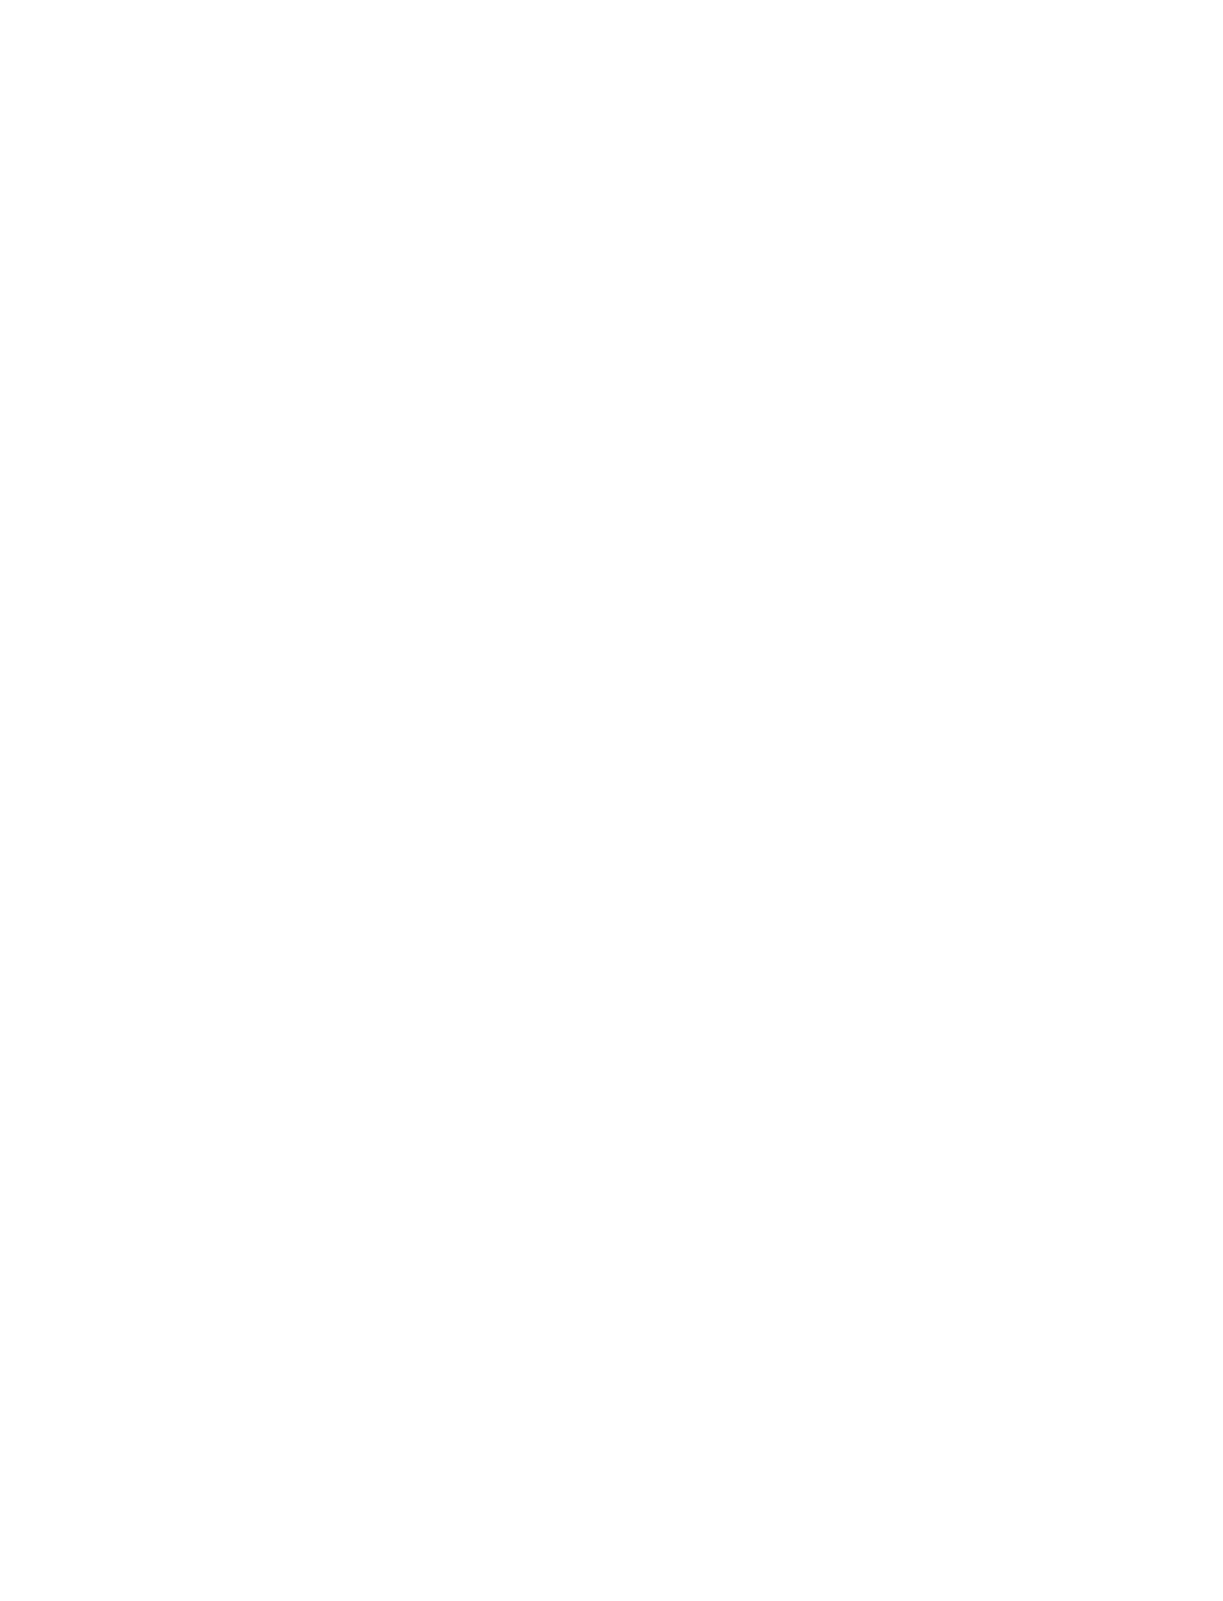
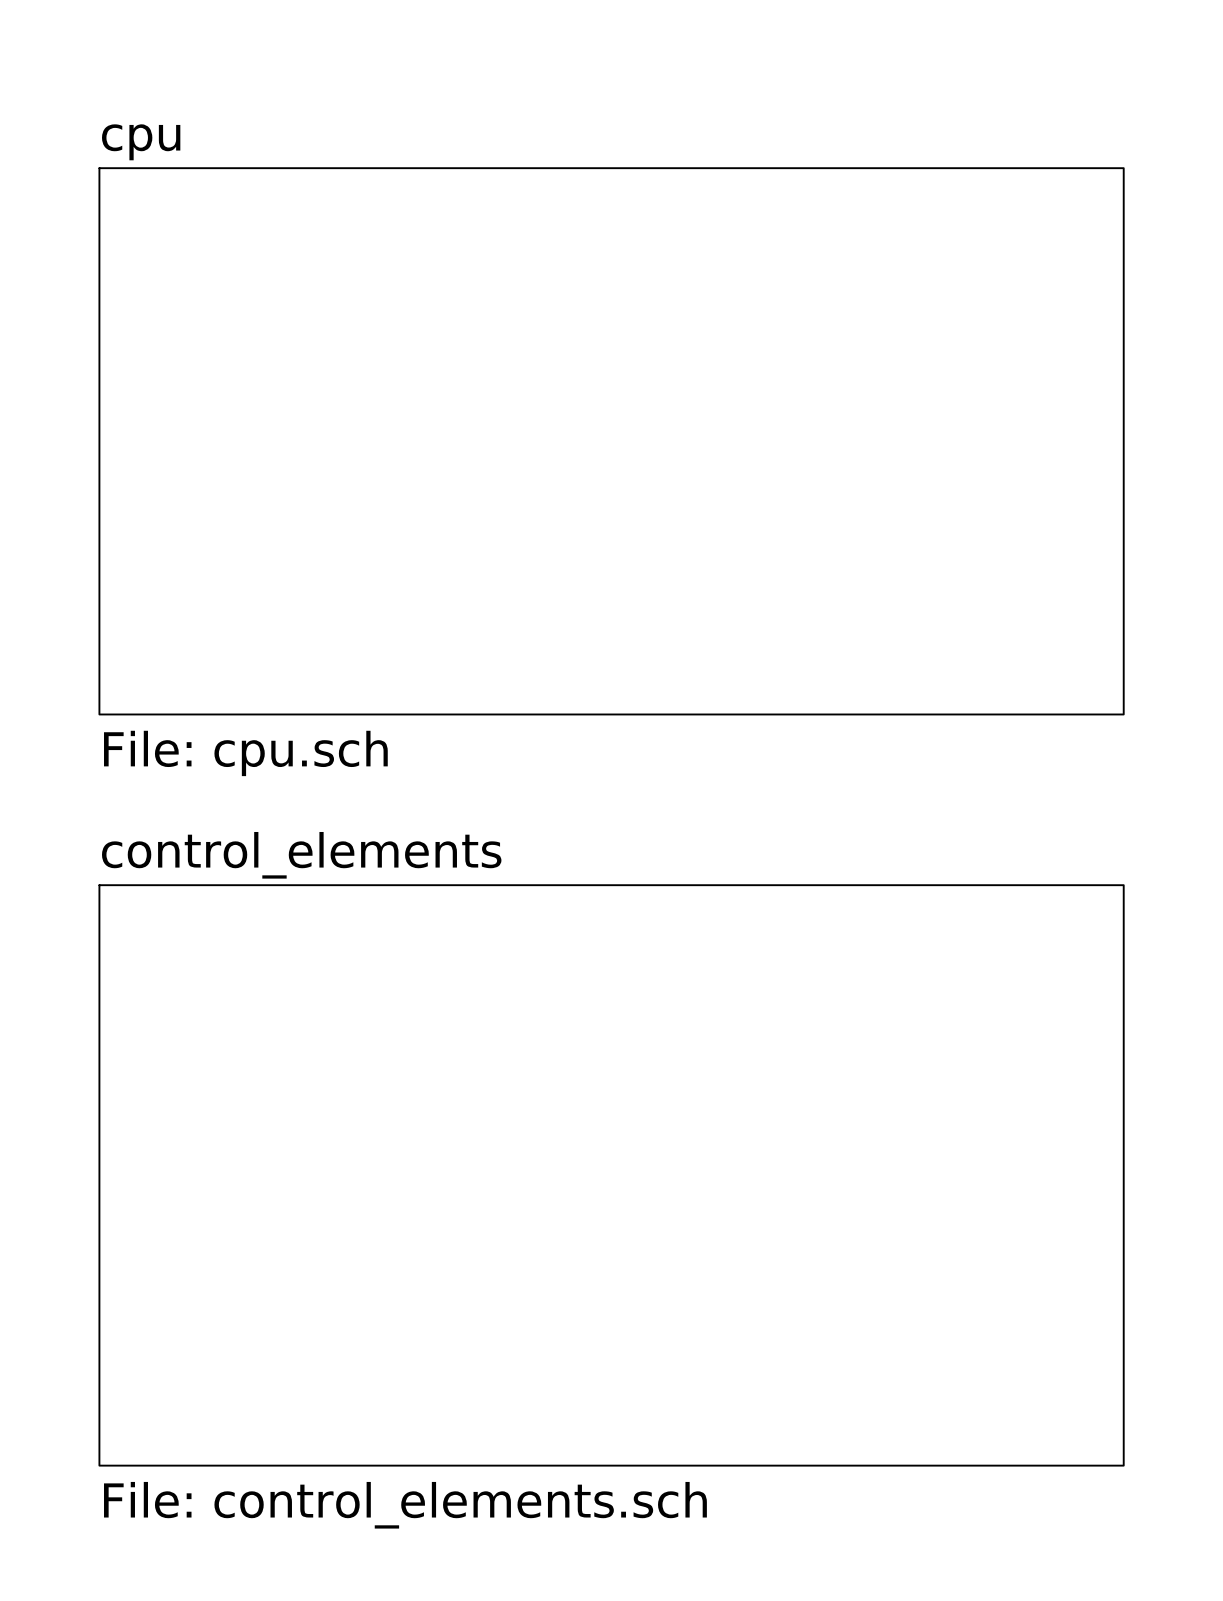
sheet cpu: none -> File: cpu.sch (611, 441)
sheet control_elements: none -> File: control_elements.sch (611, 1175)

